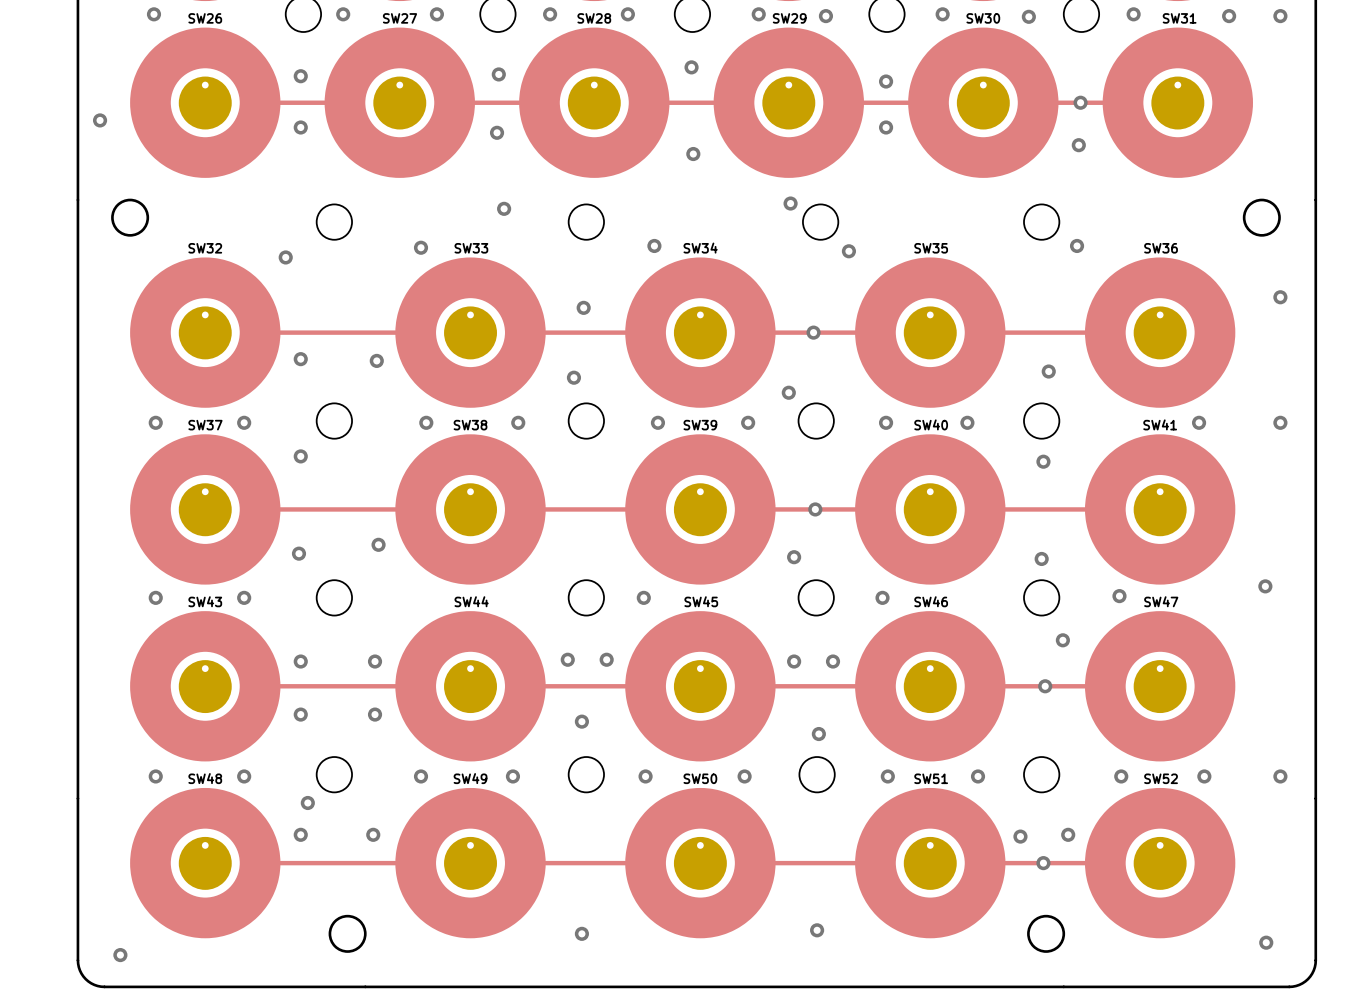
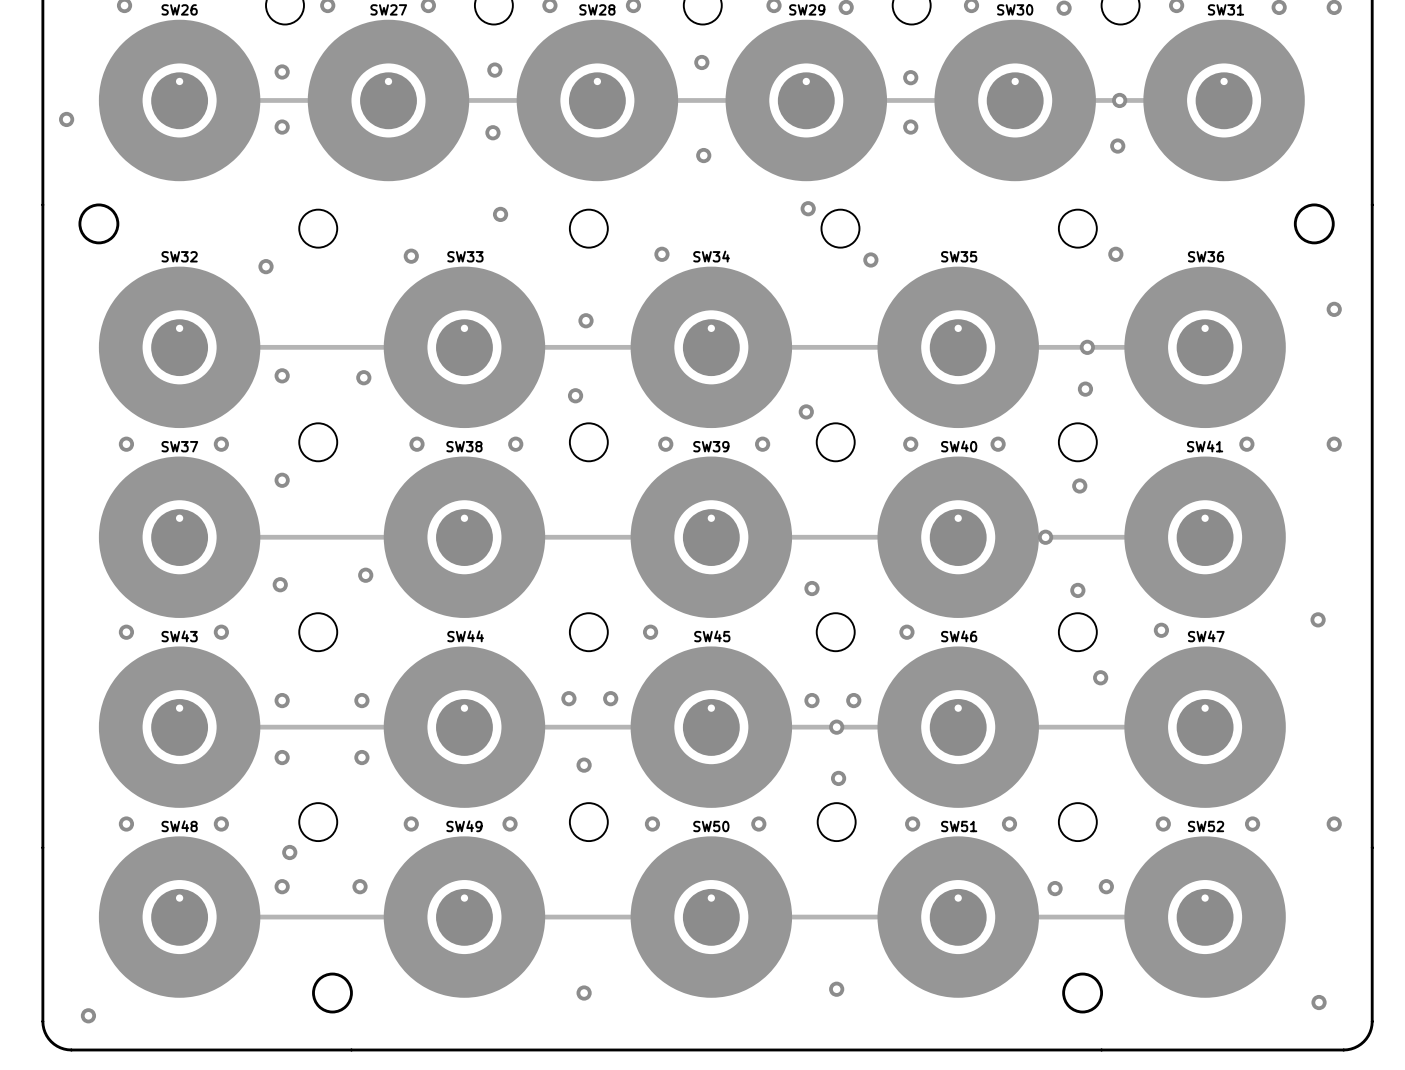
via: (813, 332) -> none
via: none -> (1087, 347)
via: (815, 509) -> none
via: none -> (1045, 537)
via: none -> (836, 727)
via: (1045, 686) -> none
via: (1043, 863) -> none

